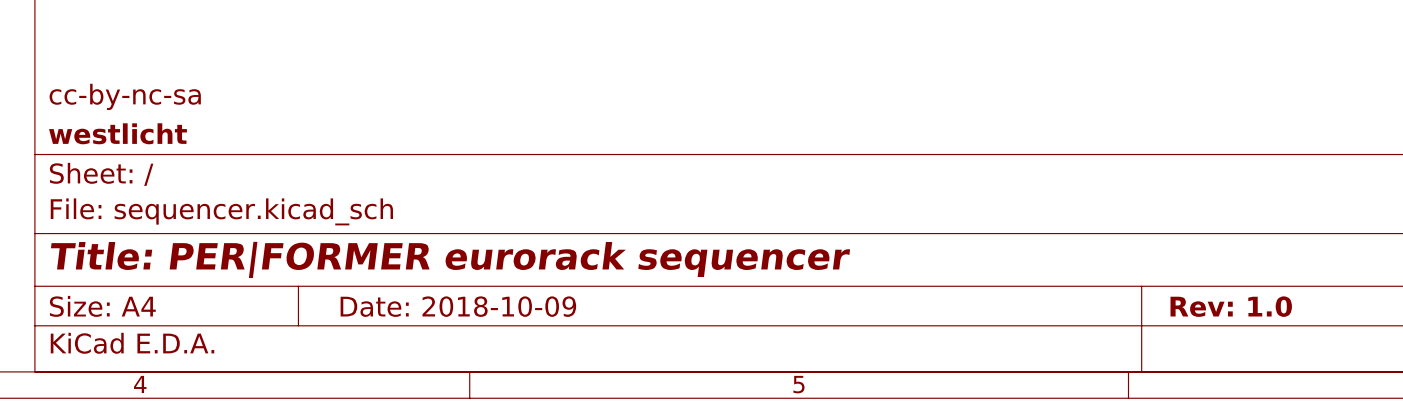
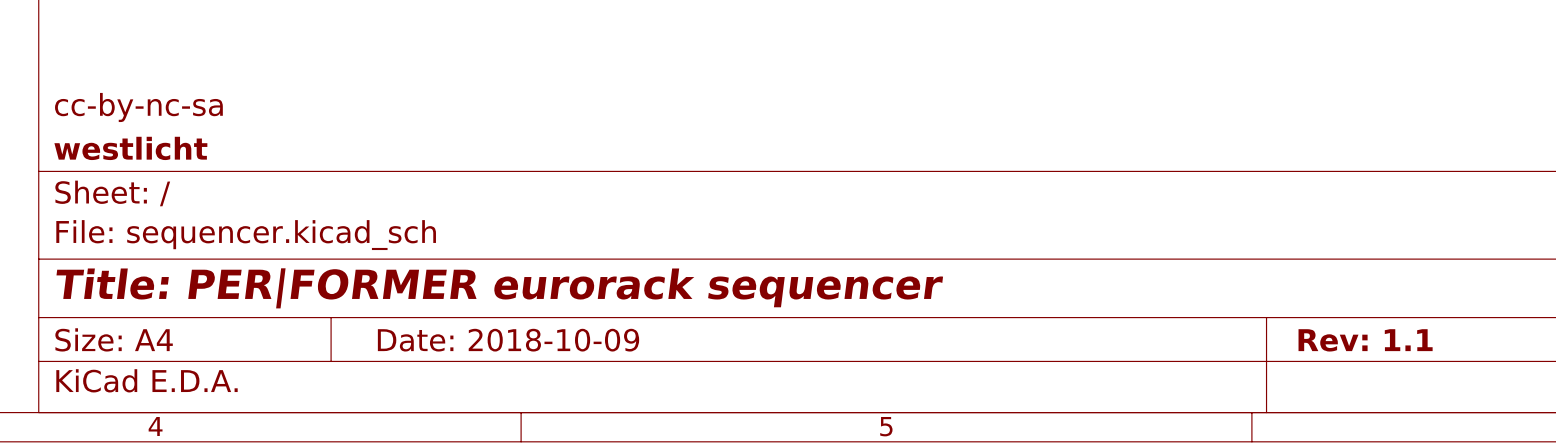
title block: Rev: 1.0 (1231, 306) -> Rev: 1.1 (1365, 340)

